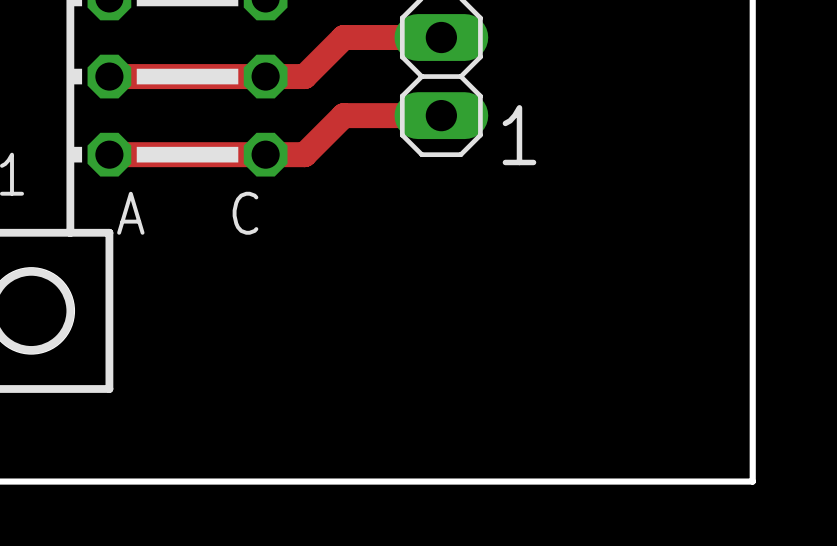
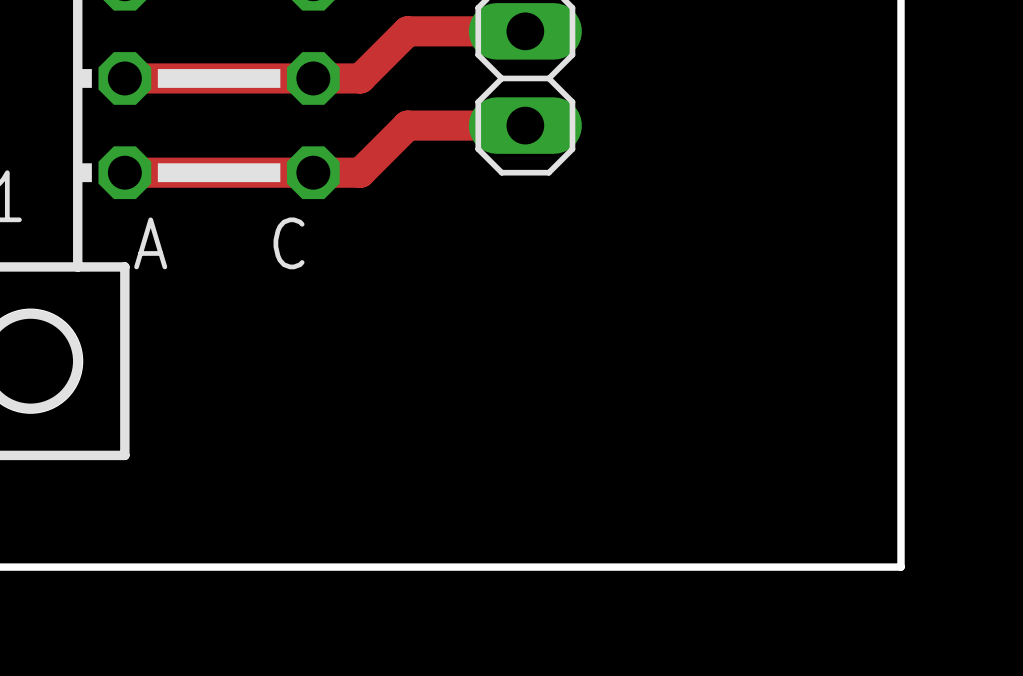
text: 1 (519, 135) -> none

